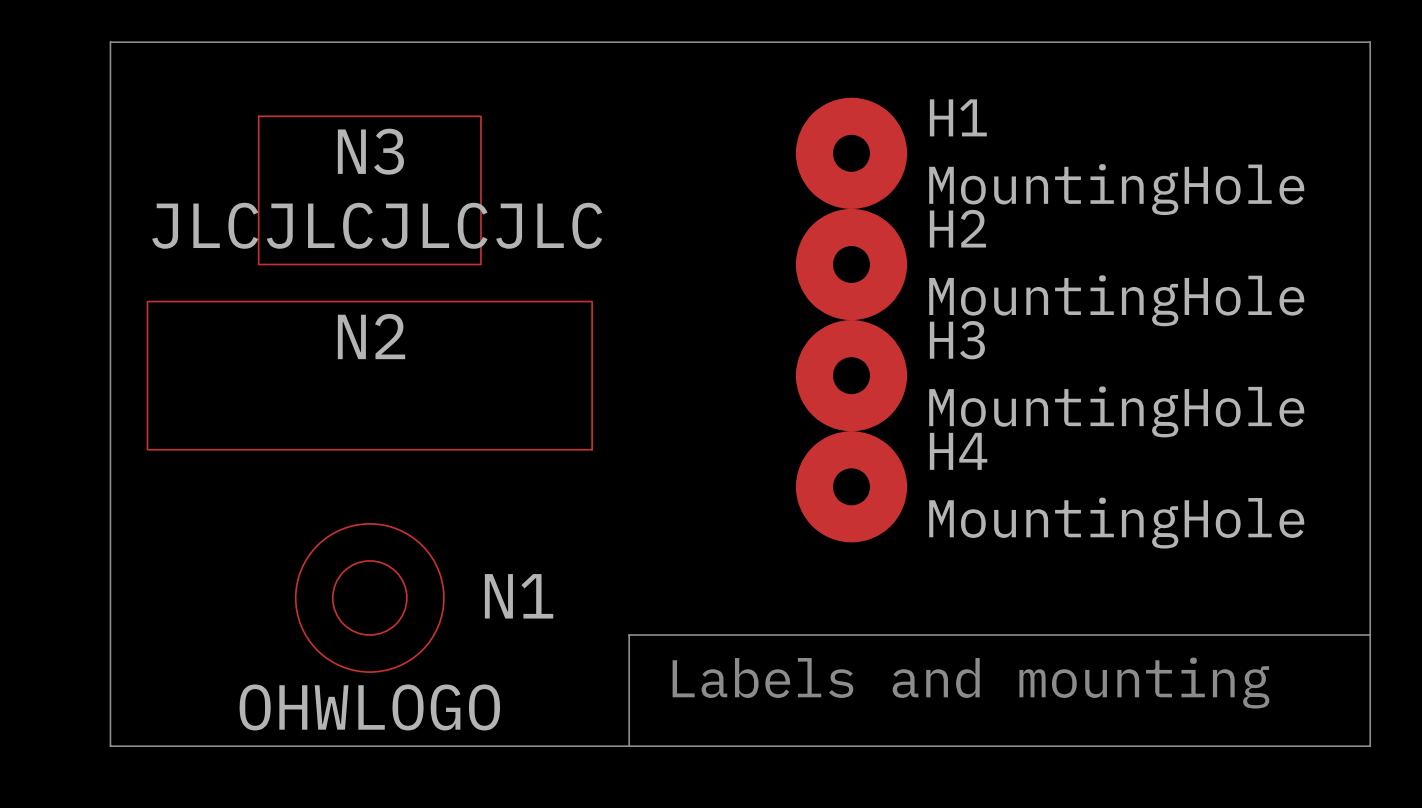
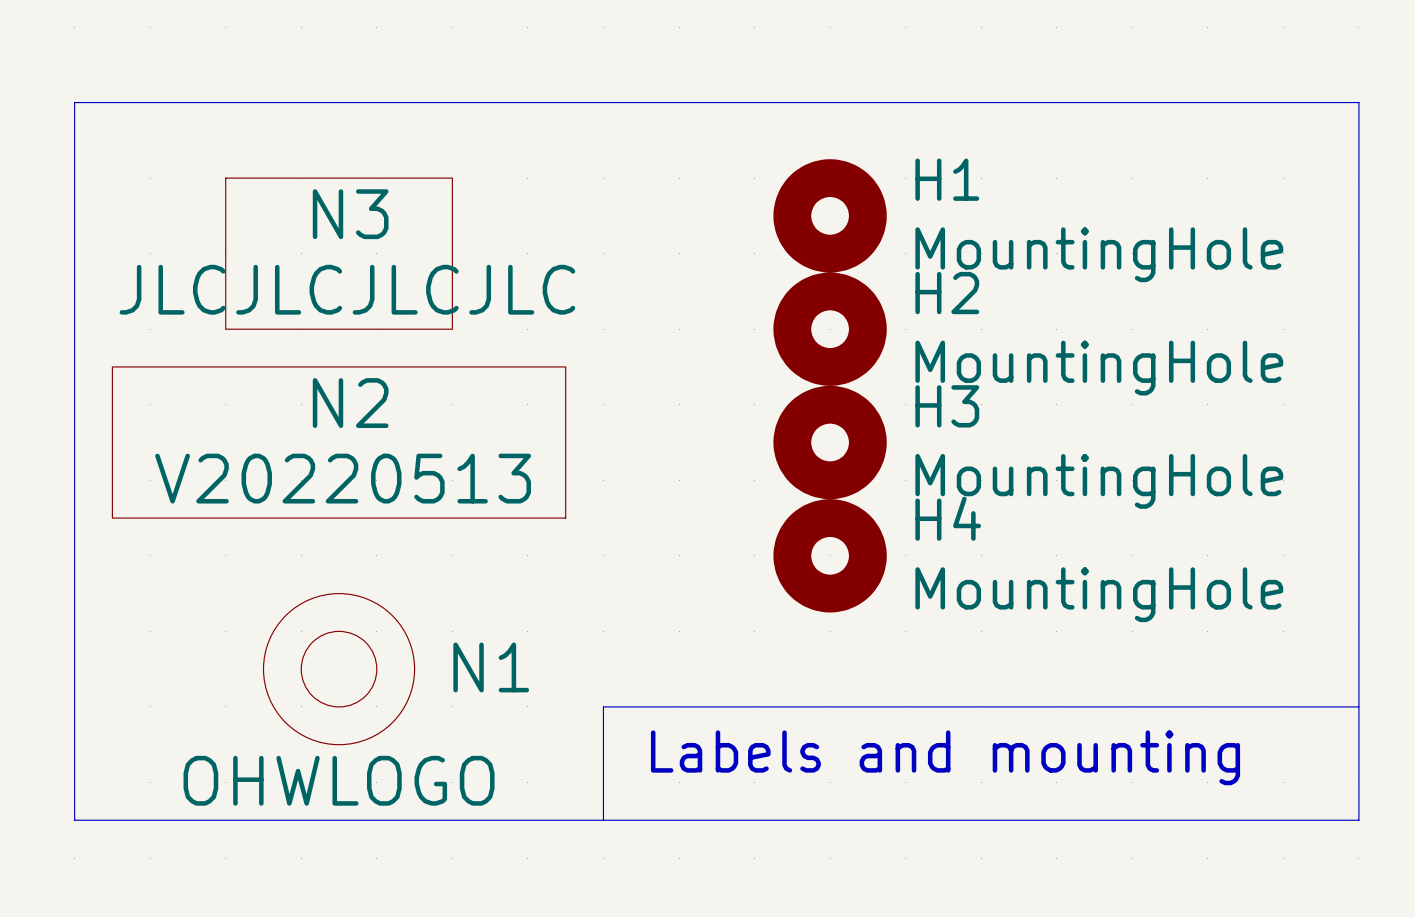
N2 value: none -> V20220513 (343, 478)

